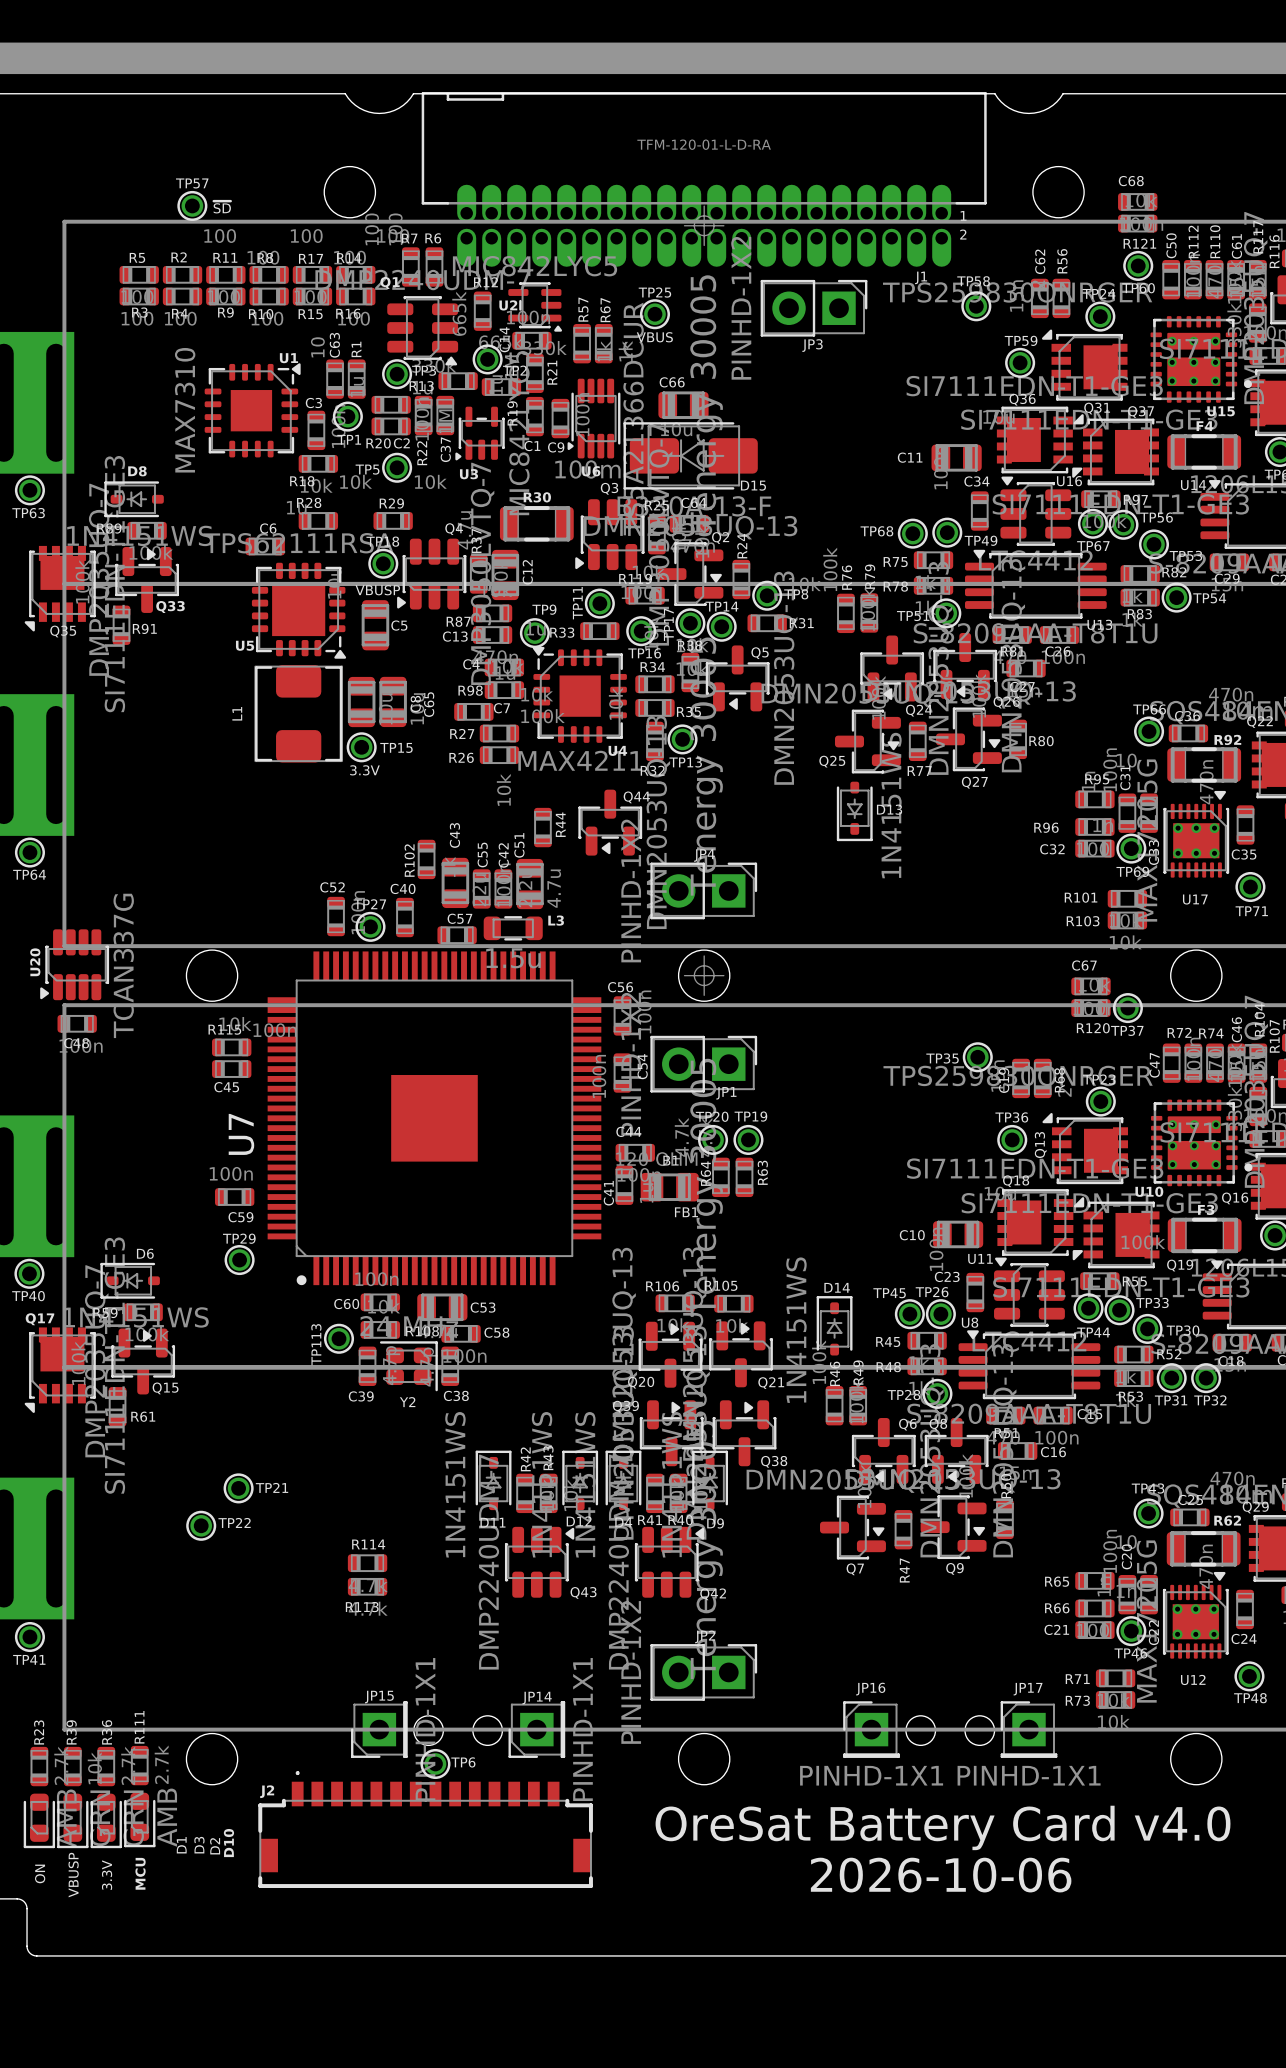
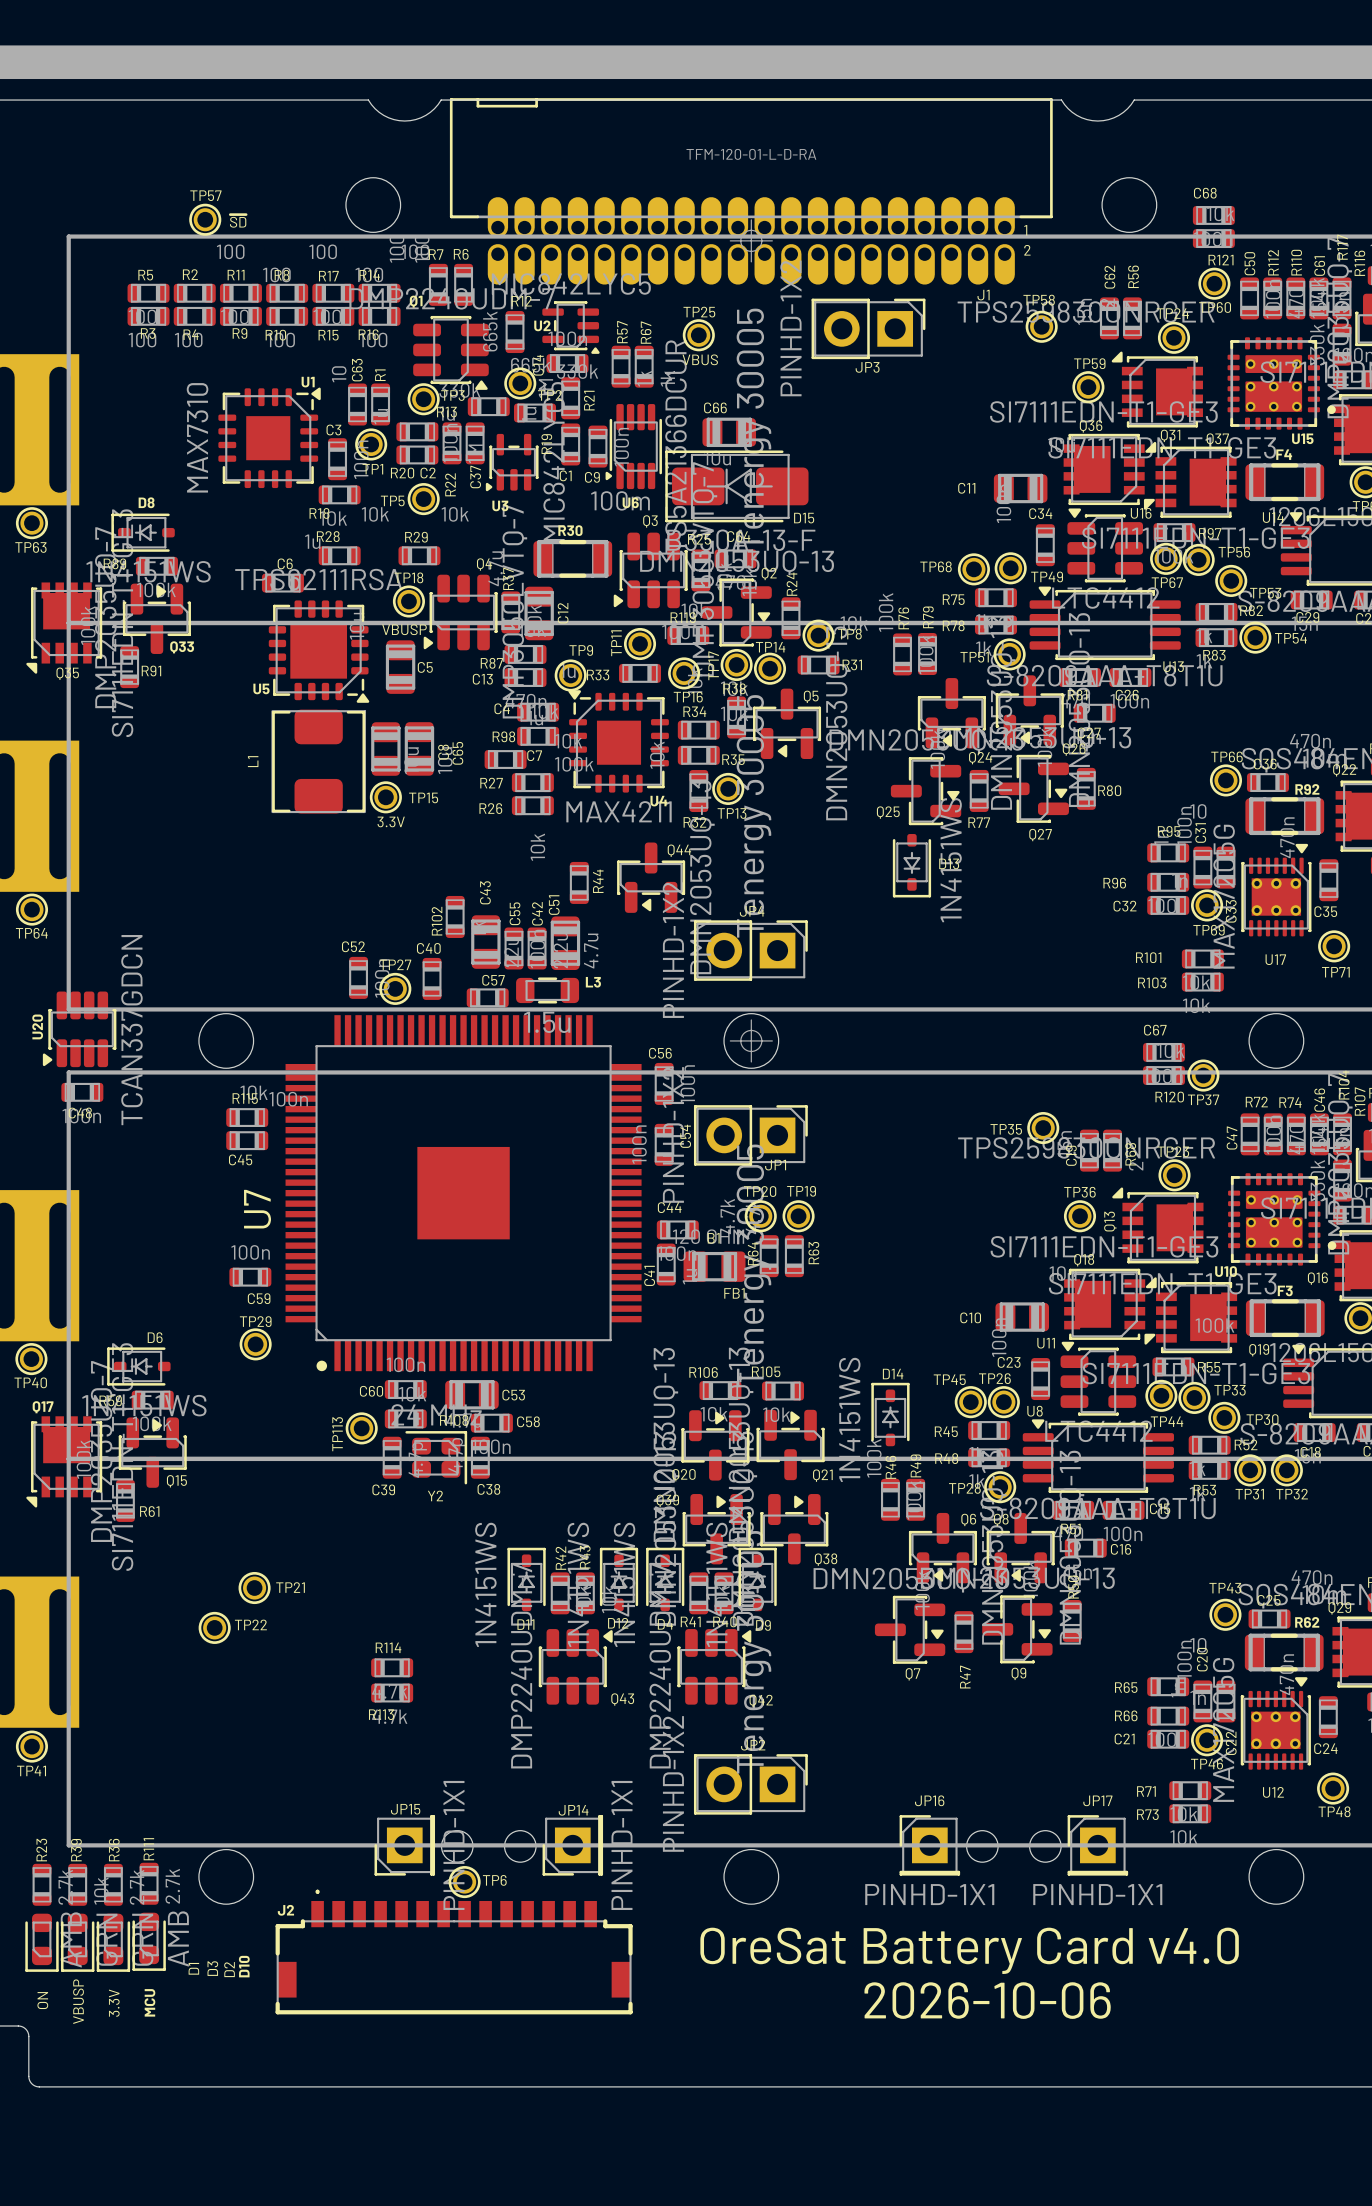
U20 value: TCAN337G (123, 965) -> TCAN337GDCN (131, 1030)

